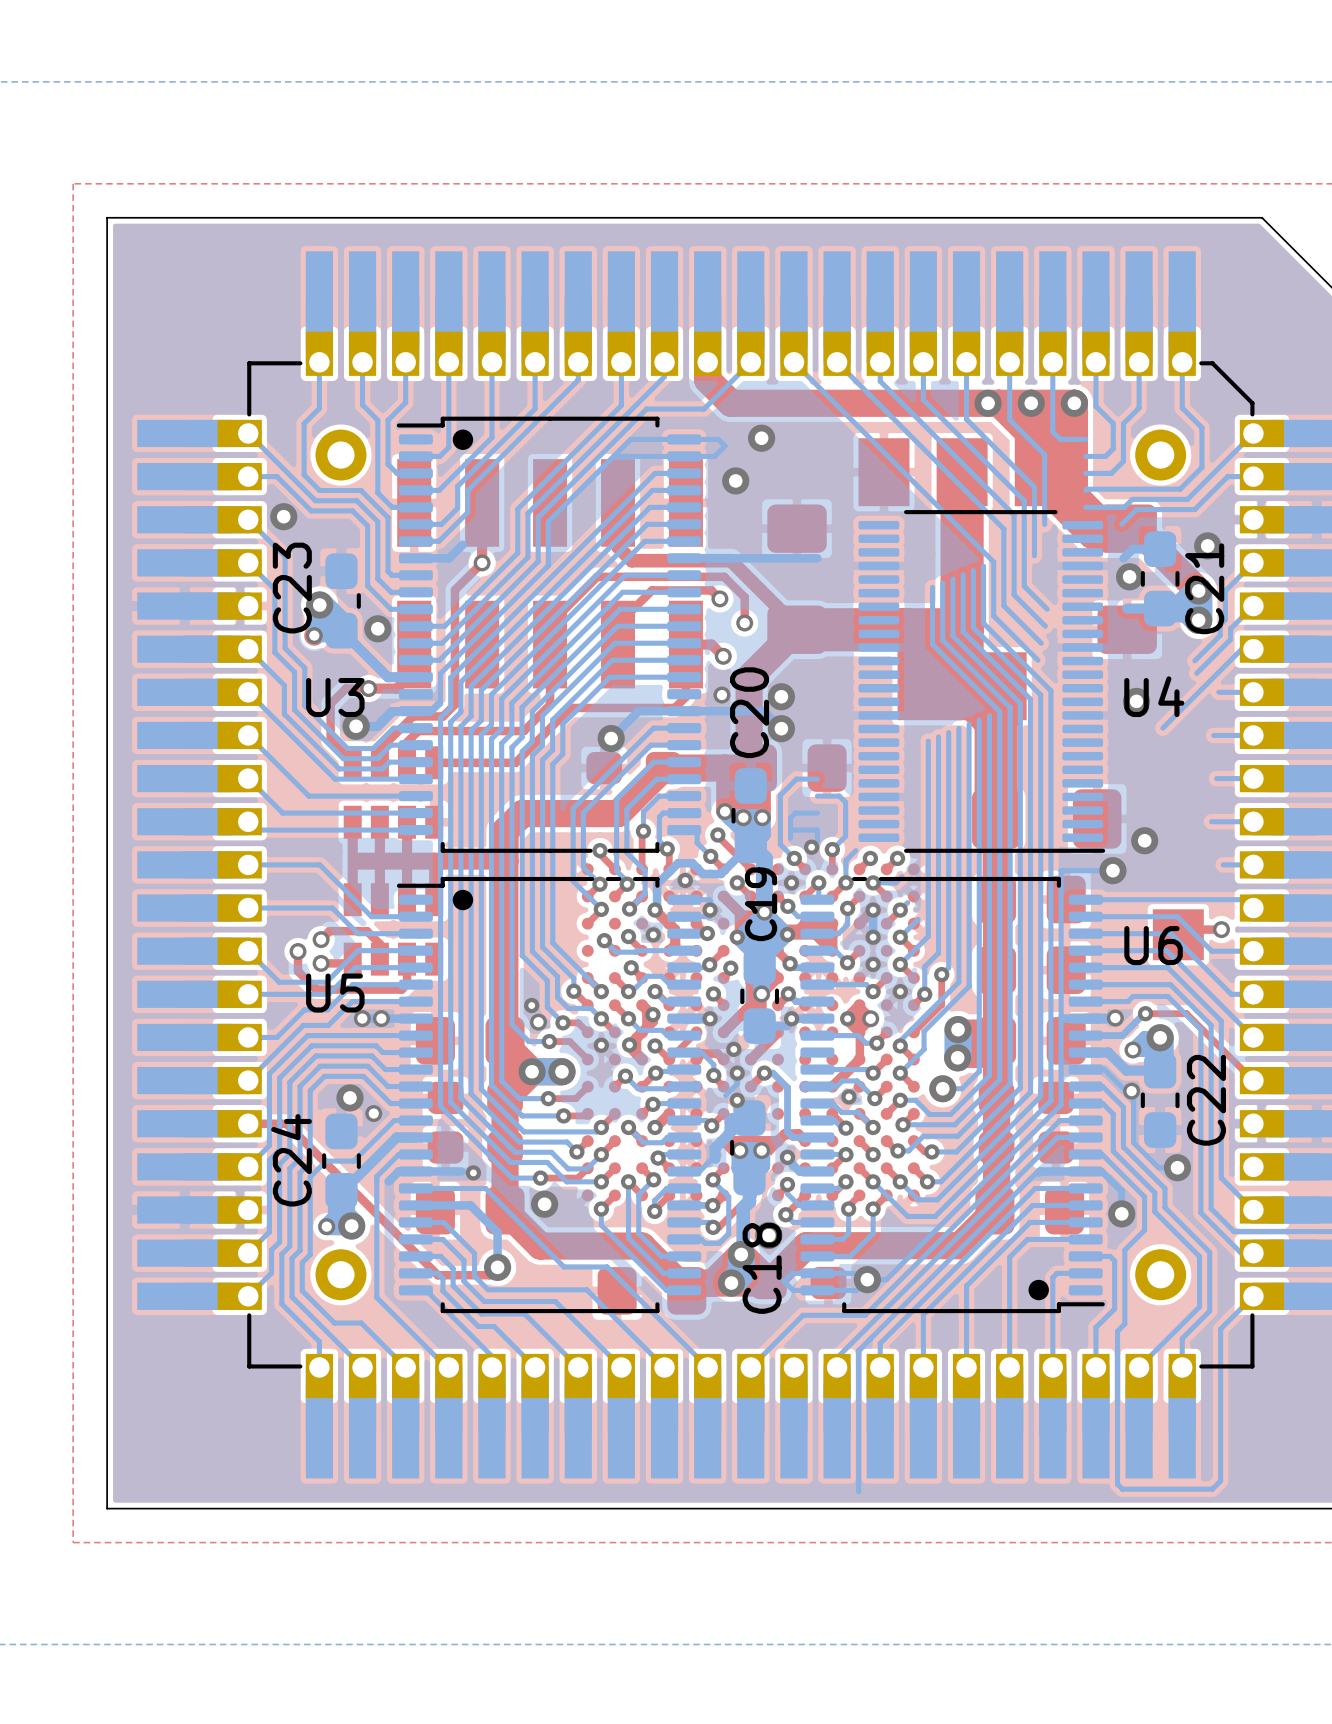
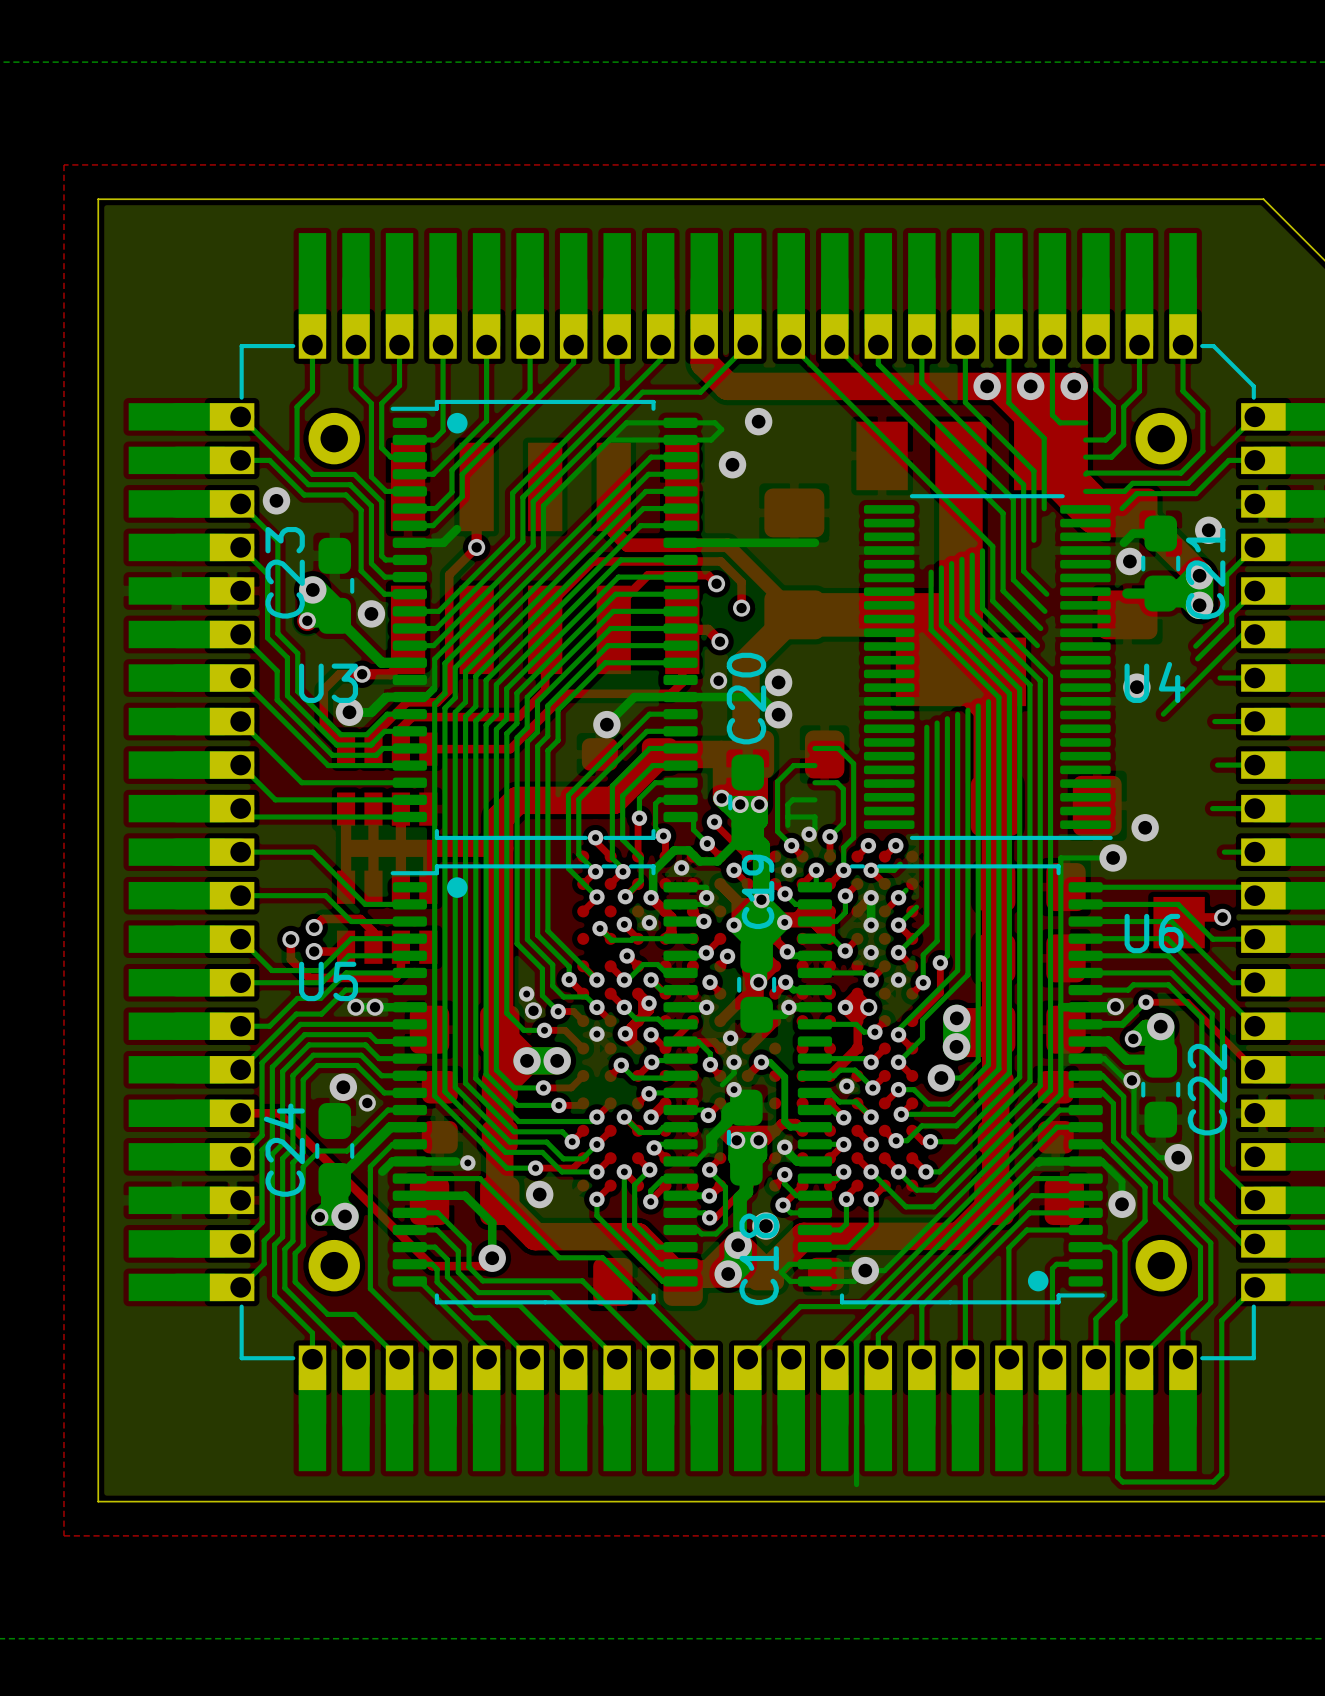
U4 footprint: [858, 510, 1106, 853] -> [863, 494, 1113, 840]
bottom track: none -> (814, 748) (838, 748) (853, 763) (853, 837)

